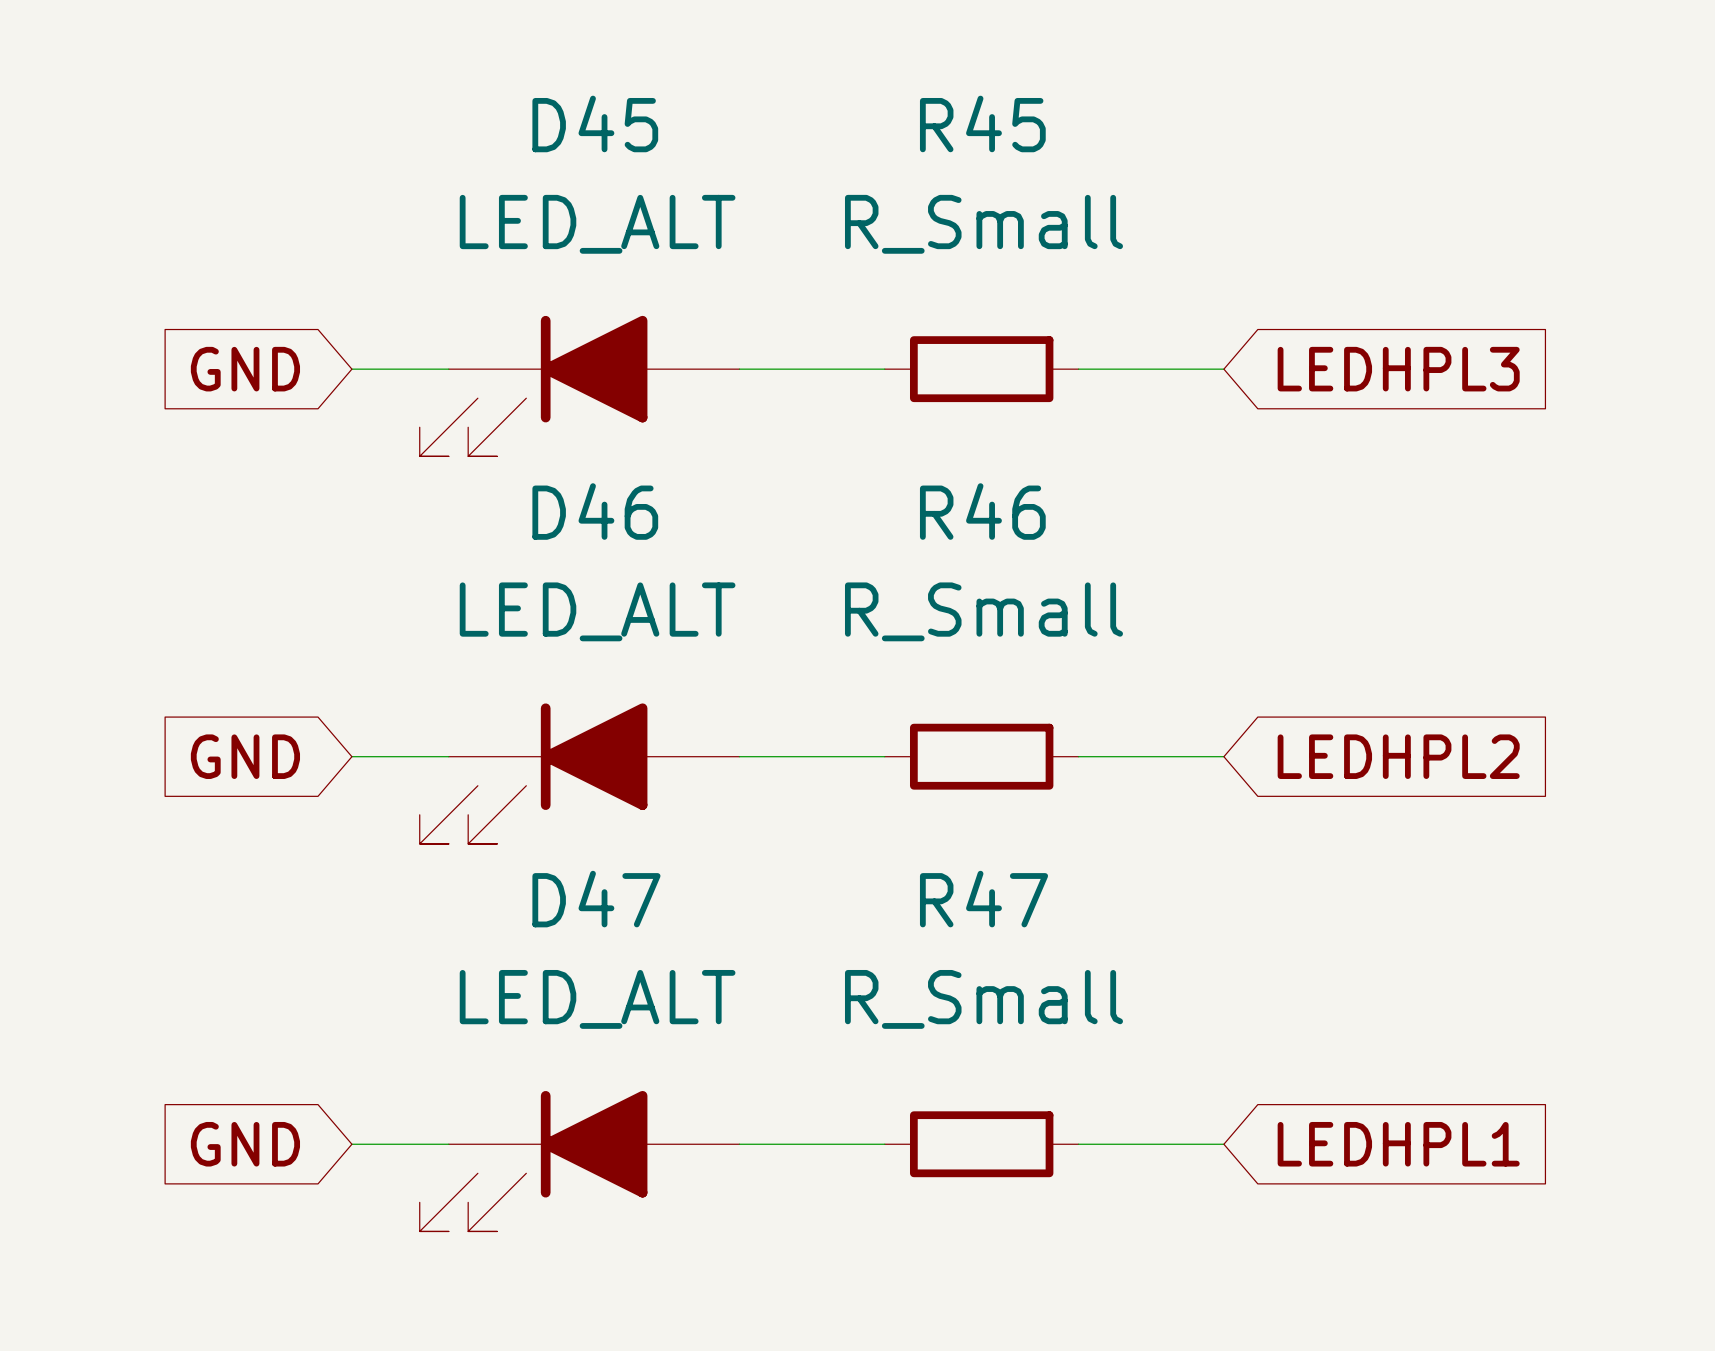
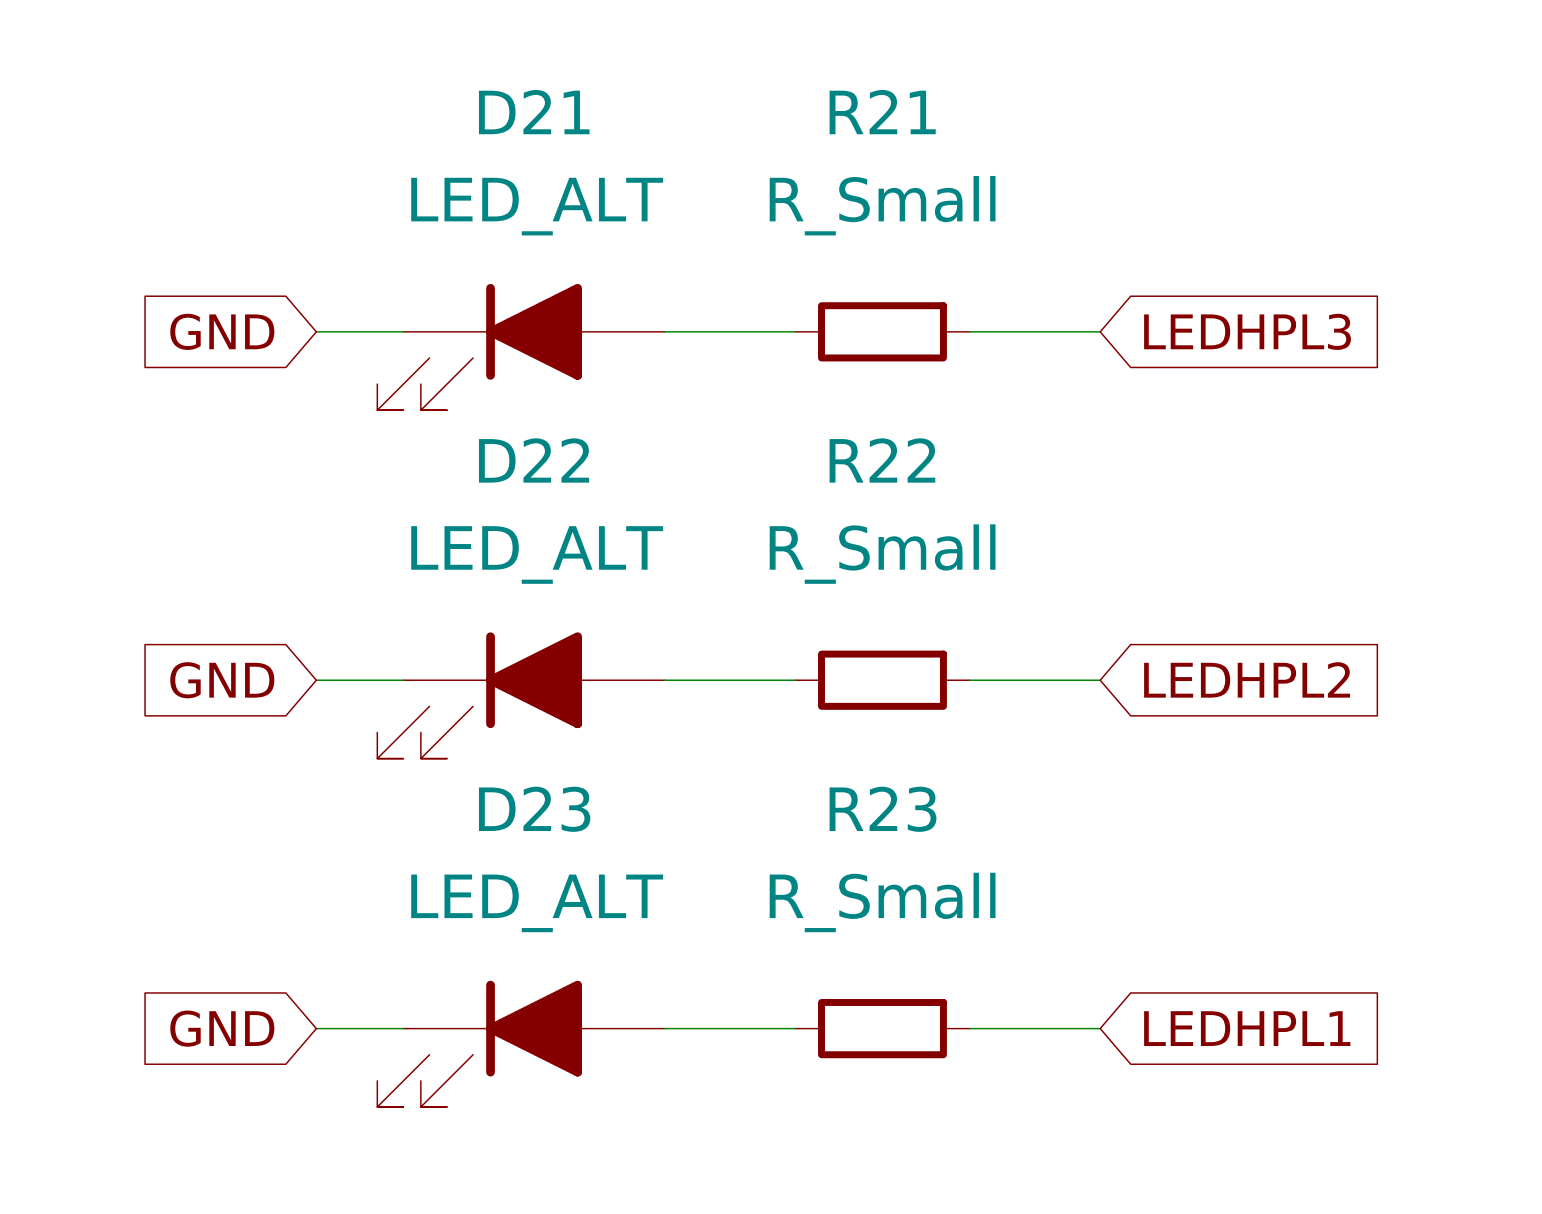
D45 name: D45 (595, 123) -> D21 (534, 112)
R45 name: R45 (982, 123) -> R21 (882, 112)
D46 name: D46 (595, 511) -> D22 (534, 460)
R46 name: R46 (982, 511) -> R22 (882, 460)
D47 name: D47 (596, 899) -> D23 (534, 809)
R47 name: R47 (983, 899) -> R23 (883, 809)

